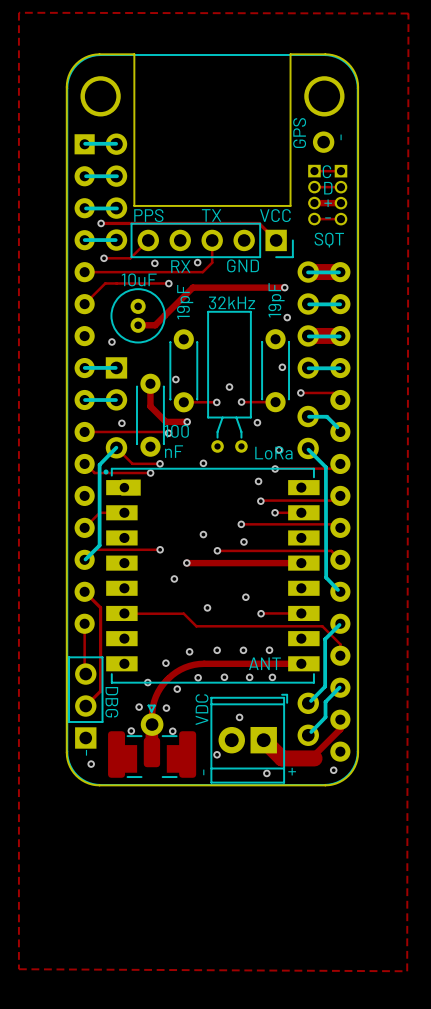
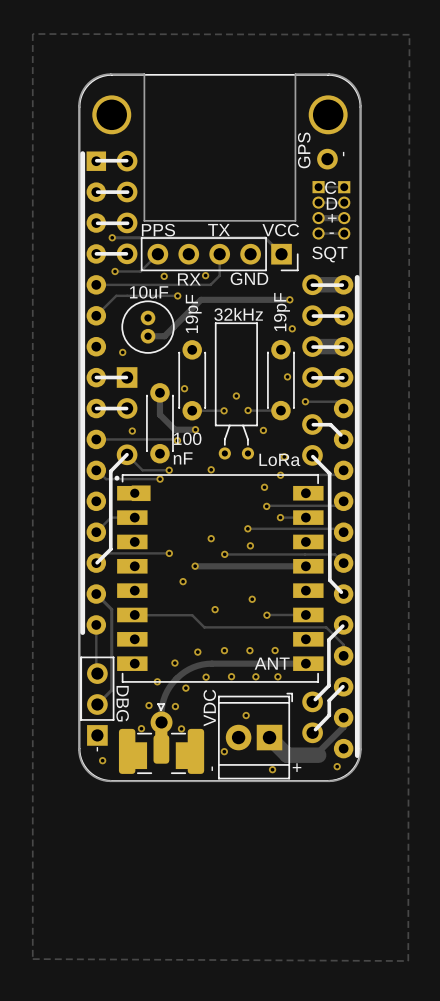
line: none -> (82, 153) (82, 632)
line: none -> (357, 277) (357, 755)

